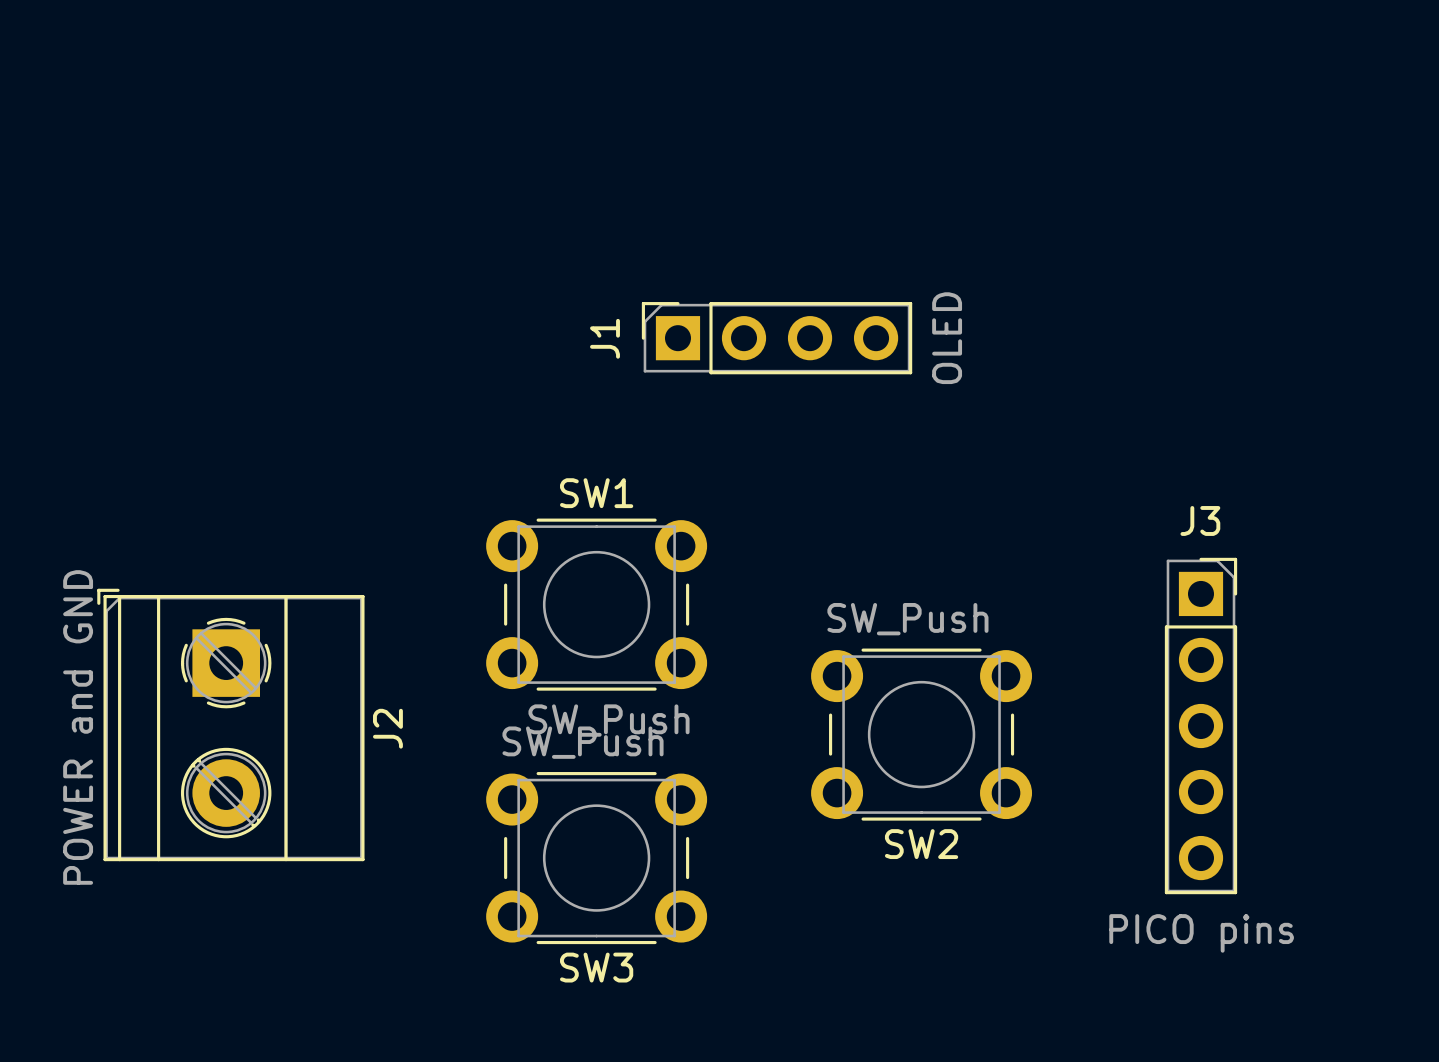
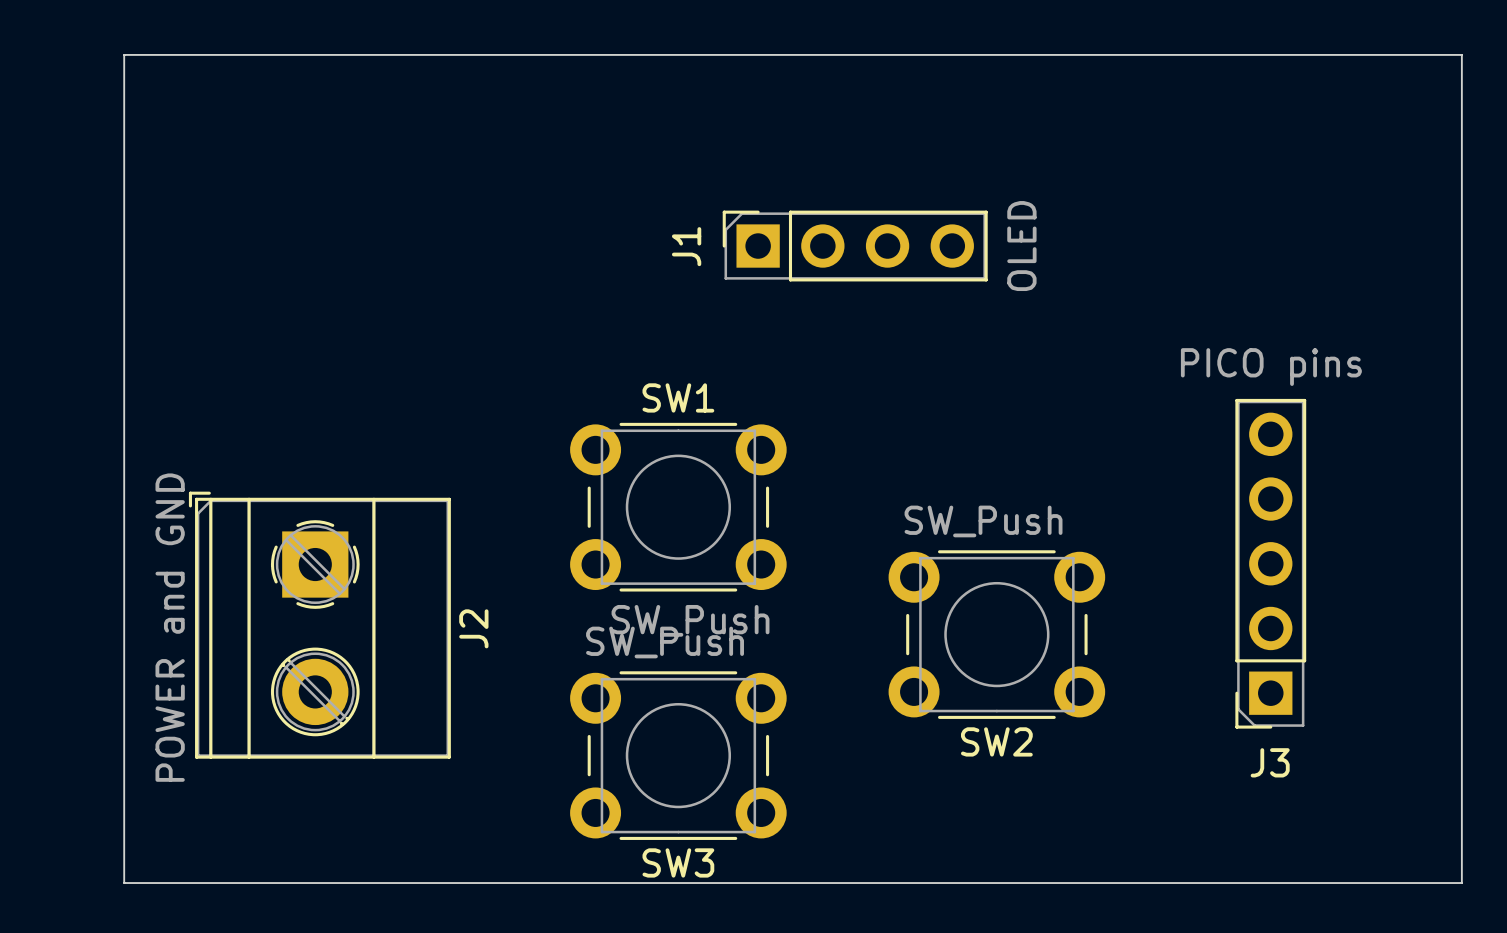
board edge: none -> (124, 54) (1461, 54) (1461, 883) (124, 883) (124, 54)
J3 rotation: 0° (1200, 726) -> 180° (1270, 563)

